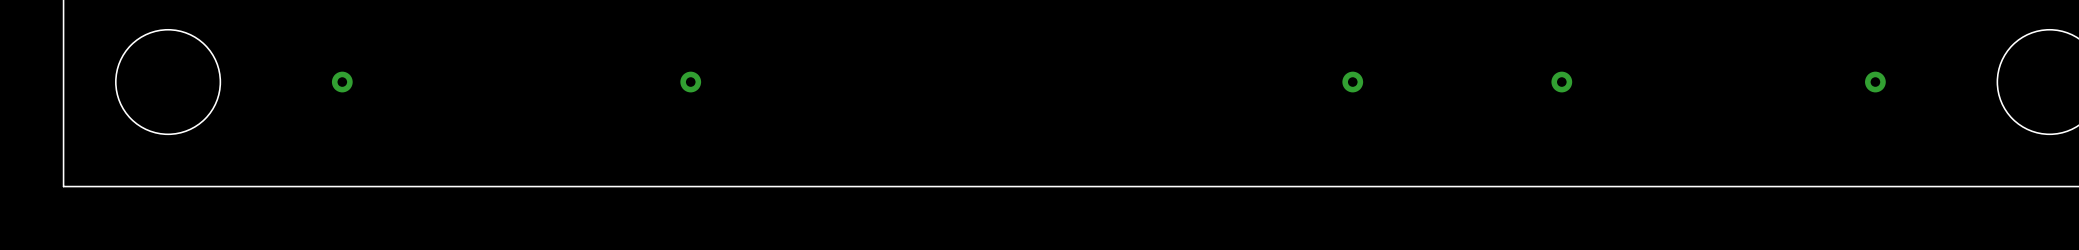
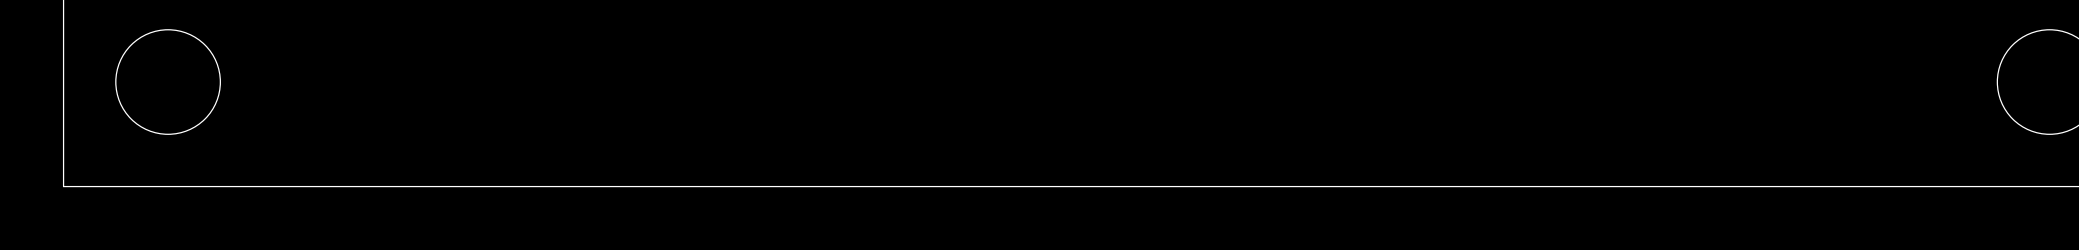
via: (342, 82) -> none
via: (690, 82) -> none
via: (1352, 82) -> none
via: (1561, 82) -> none
via: (1875, 82) -> none

